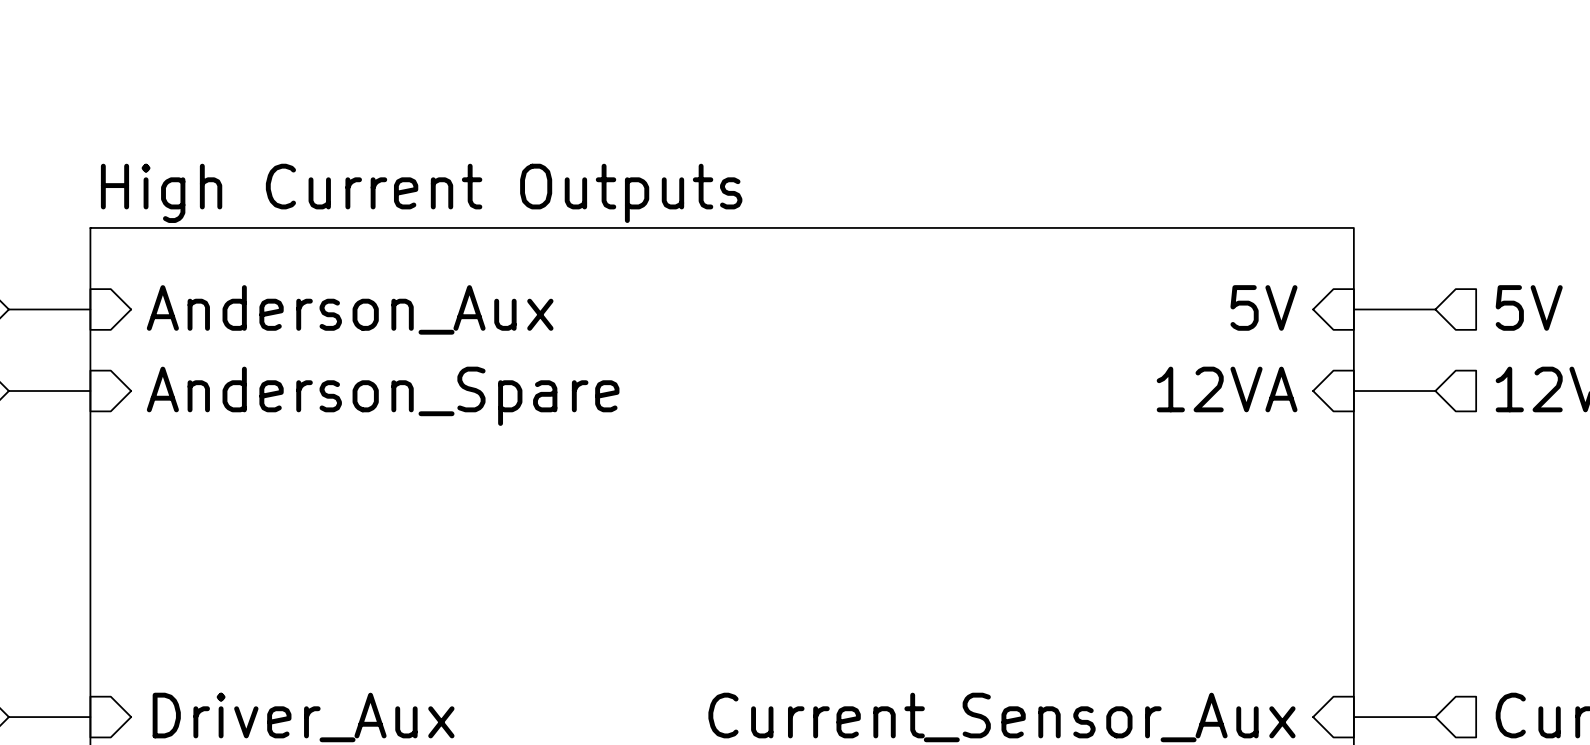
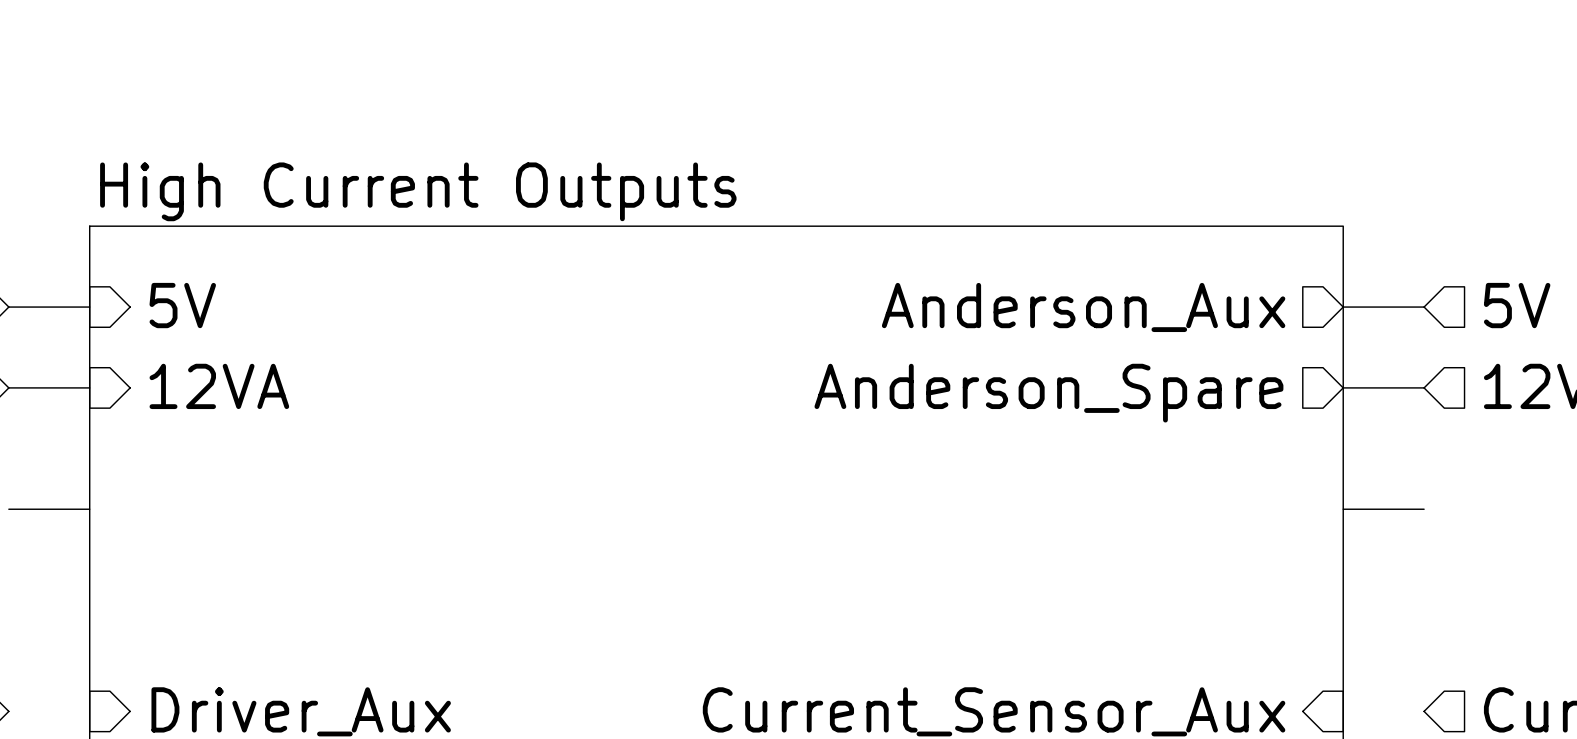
sheet pin shape: input (1263, 307) -> output (1083, 307)
sheet pin: 5V (1263, 307) -> Anderson_Aux (1083, 307)
sheet pin: Anderson_Aux (350, 309) -> 5V (182, 305)
sheet pin shape: input (1227, 389) -> output (1048, 393)
sheet pin: 12VA (1227, 389) -> Anderson_Spare (1048, 393)
sheet pin: Anderson_Spare (383, 396) -> 12VA (219, 386)
wire: (8, 717) (90, 717) -> (8, 509) (89, 509)
wire: (1353, 717) (1435, 717) -> (1343, 509) (1424, 509)

